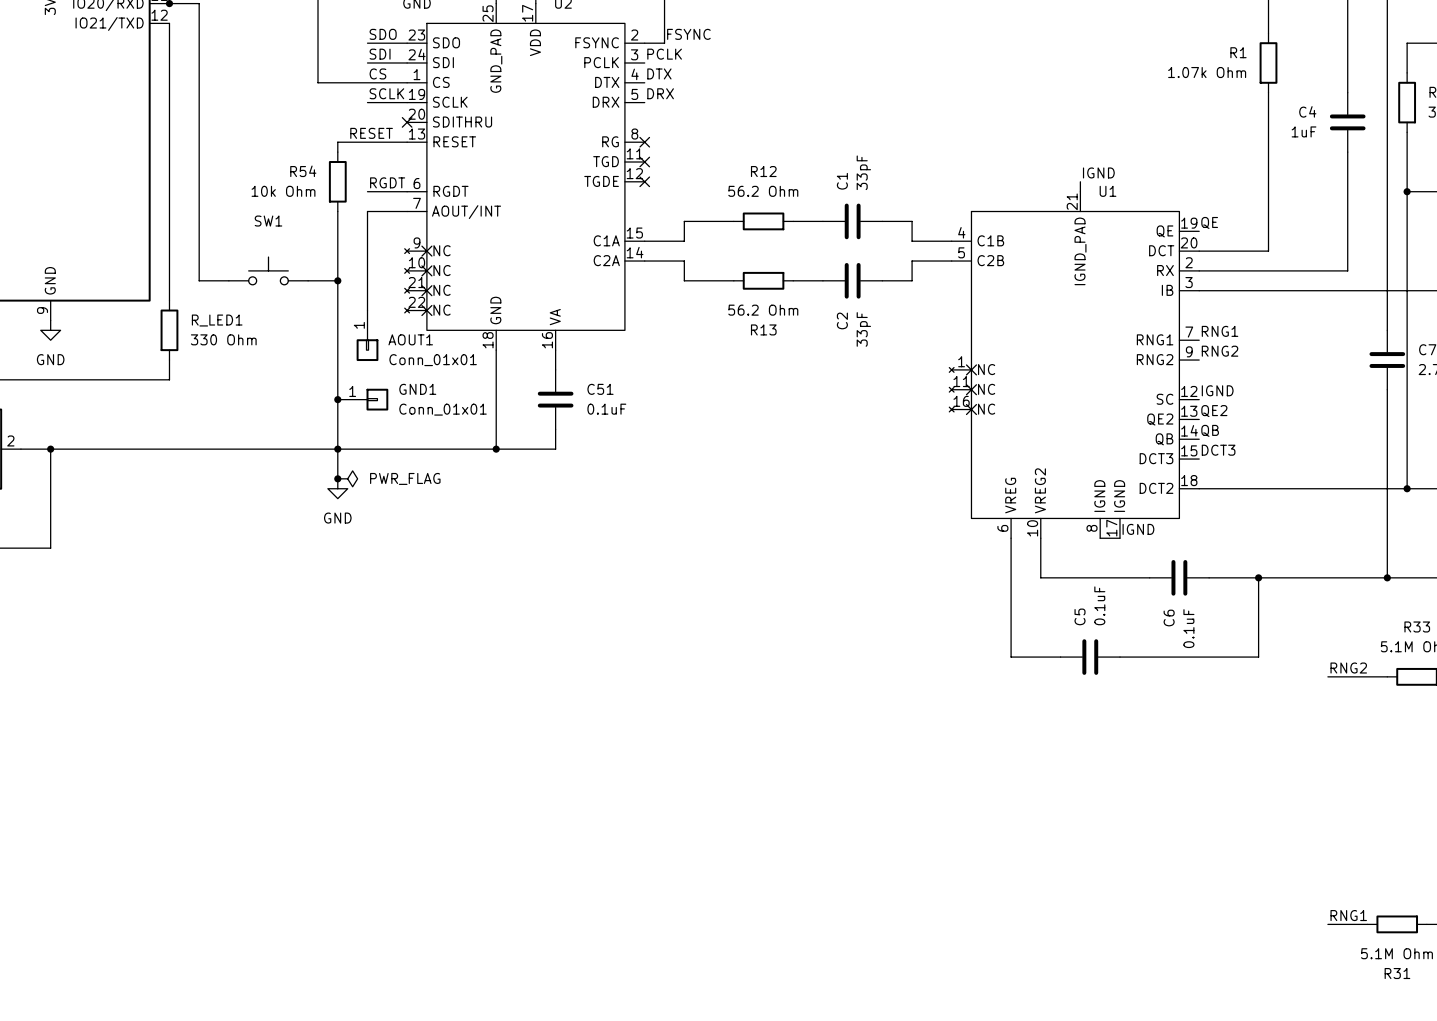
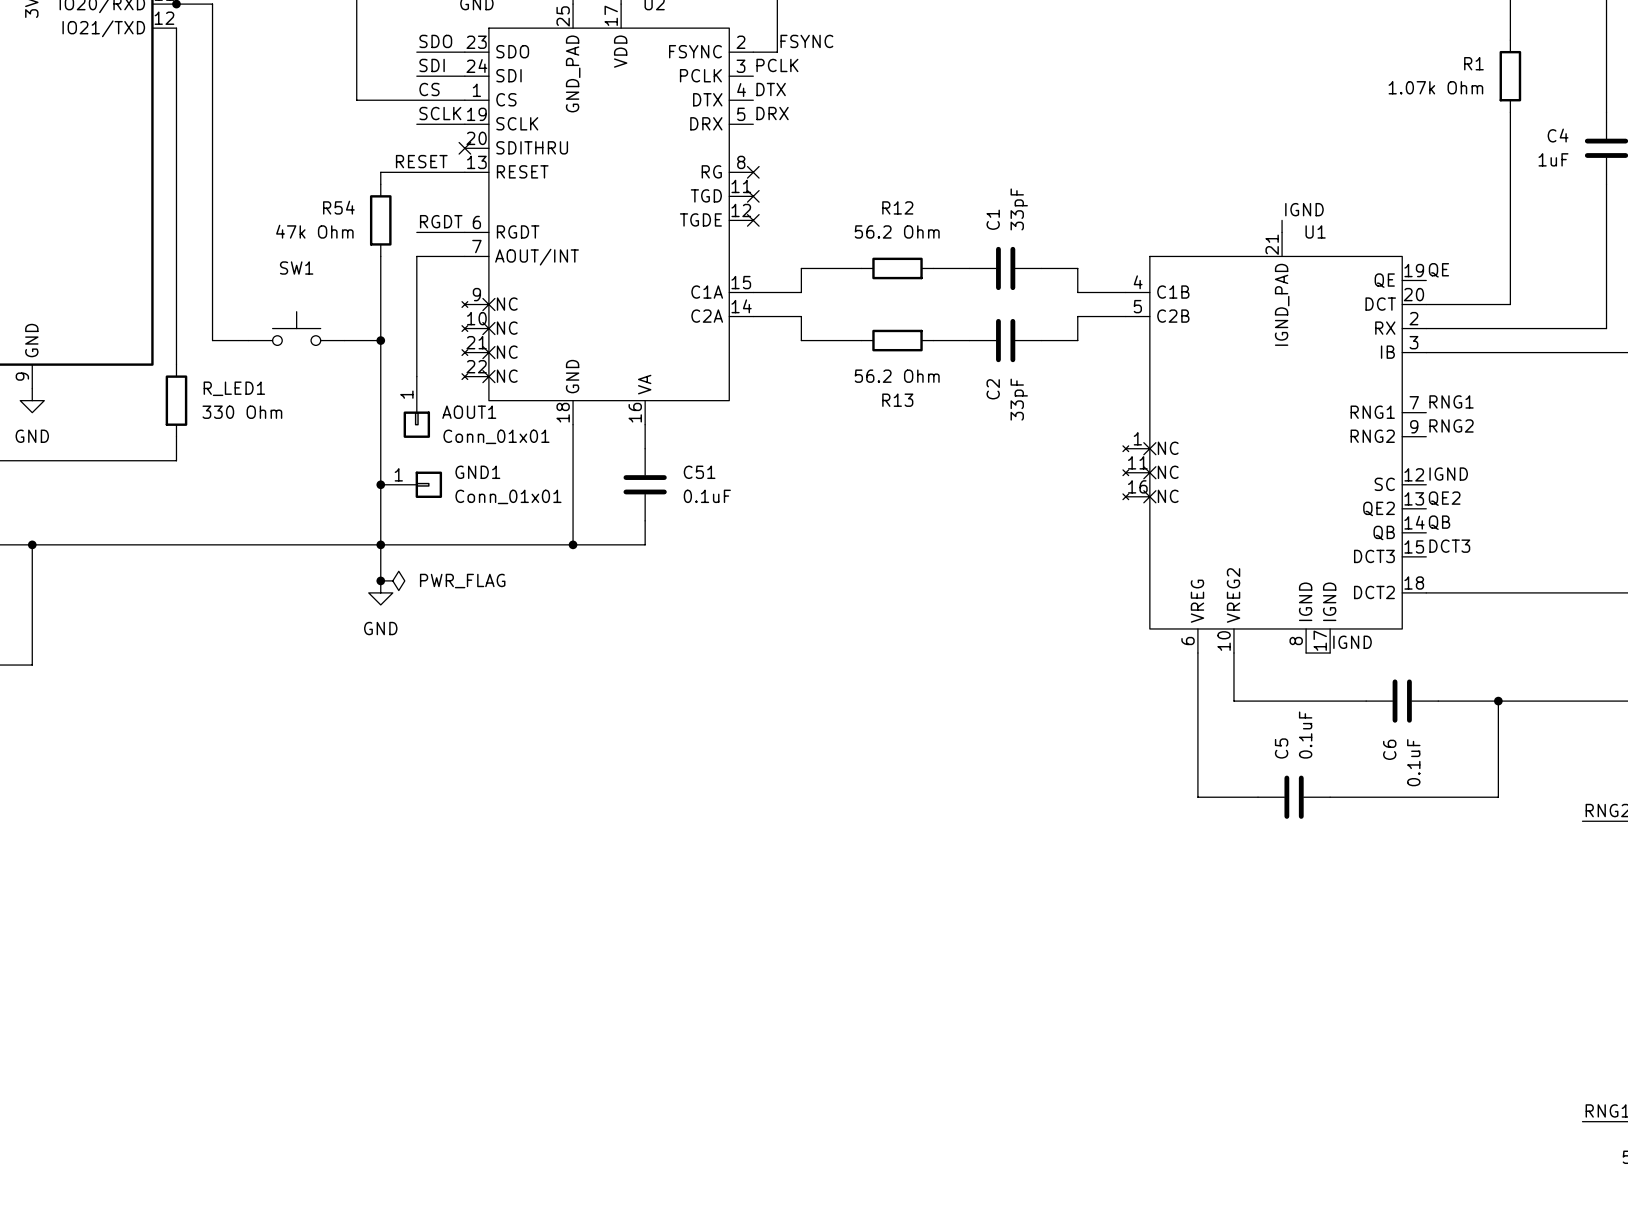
R54 value: 10k Ohm (283, 191) -> 47k Ohm (314, 231)

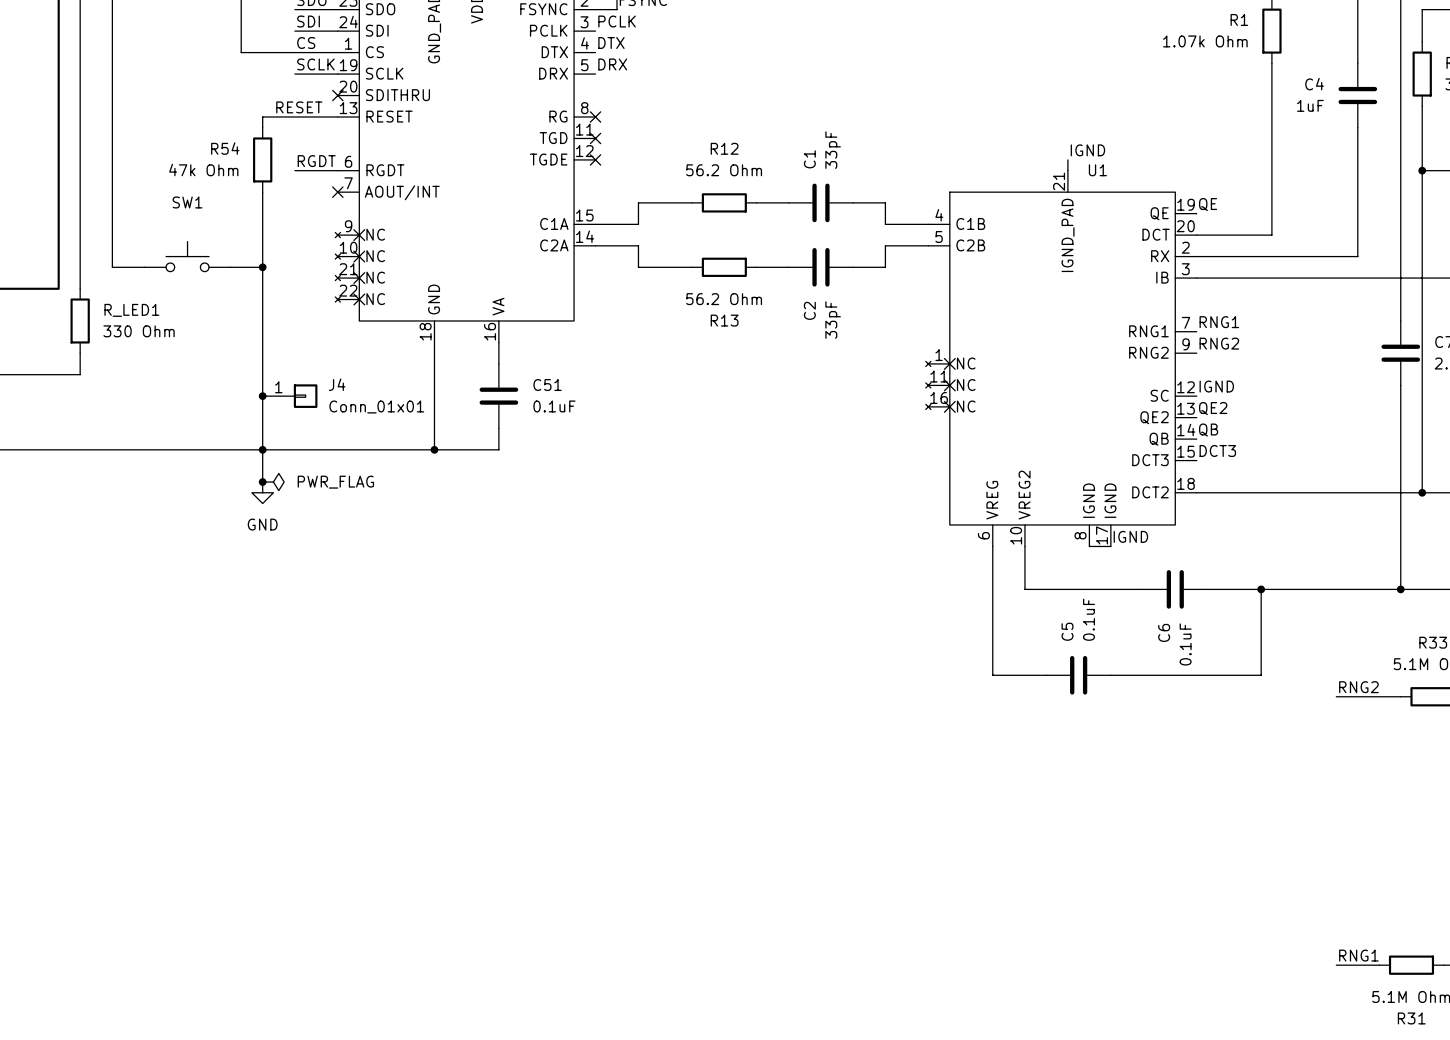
wire: (464, 256) (416, 256) (416, 376) -> none
no-connect mark: none -> (337, 192)
AOUT1: Conn_01x01 (416, 407) -> none
GND1 name: GND1 (477, 472) -> J4 (337, 384)

